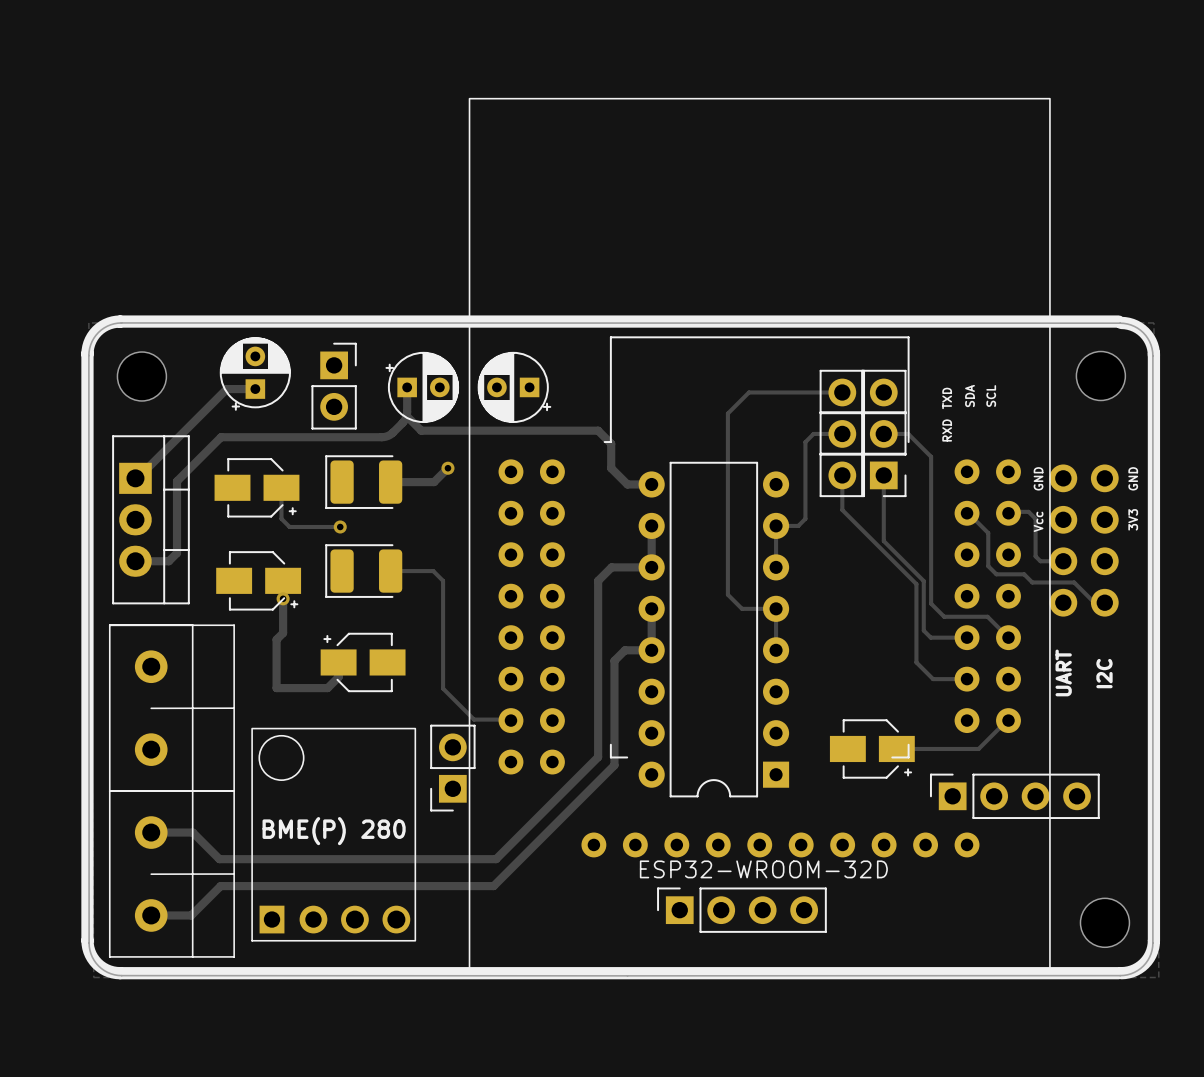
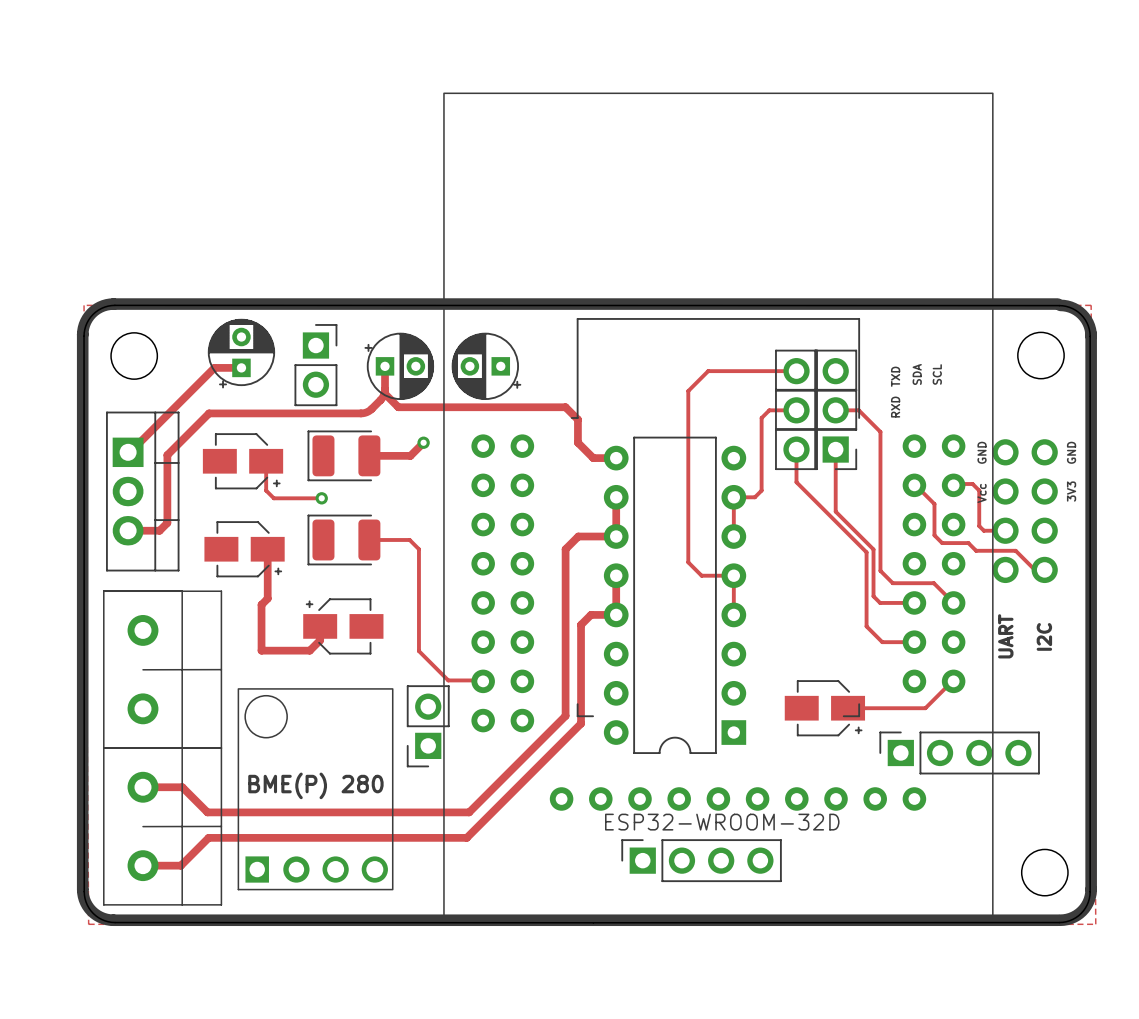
via: (283, 598) -> none

